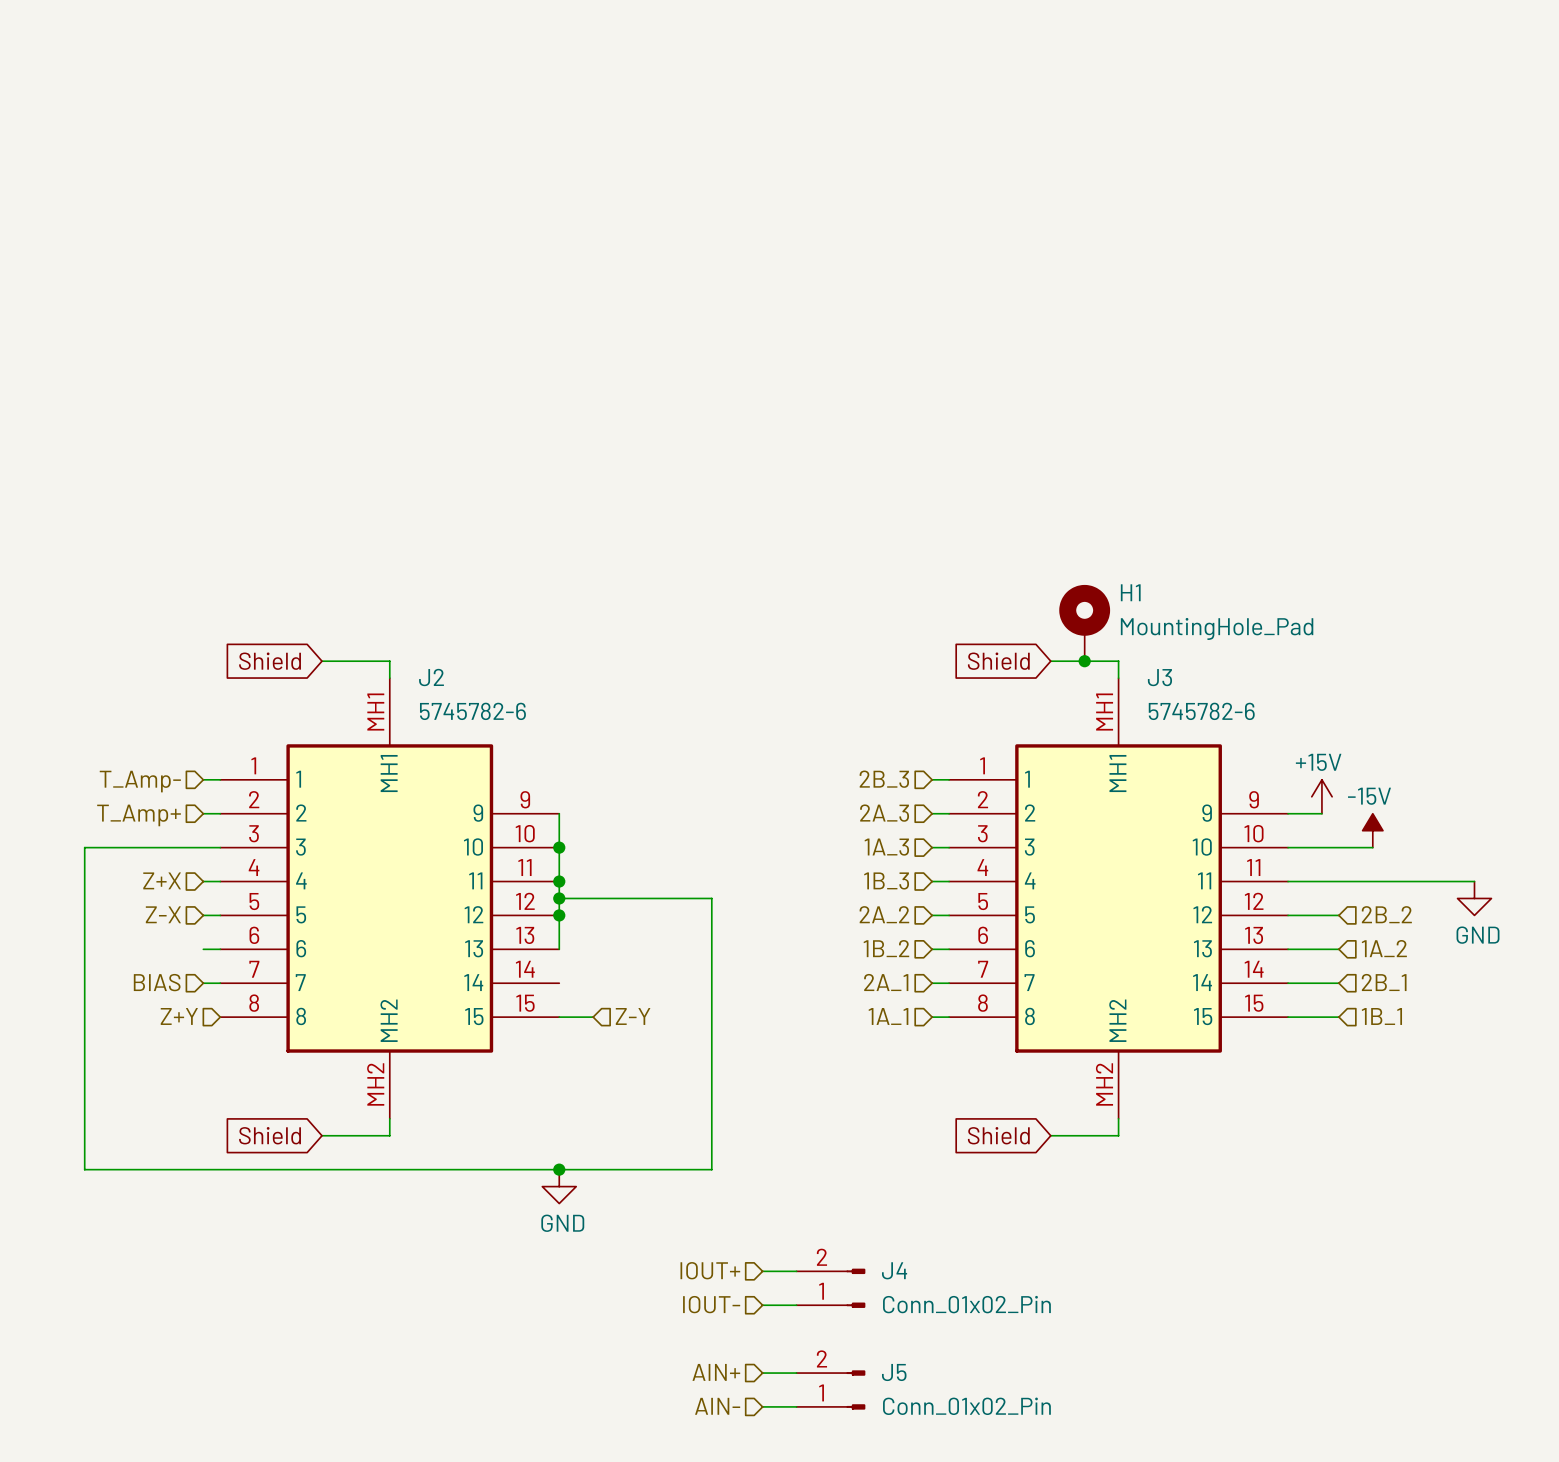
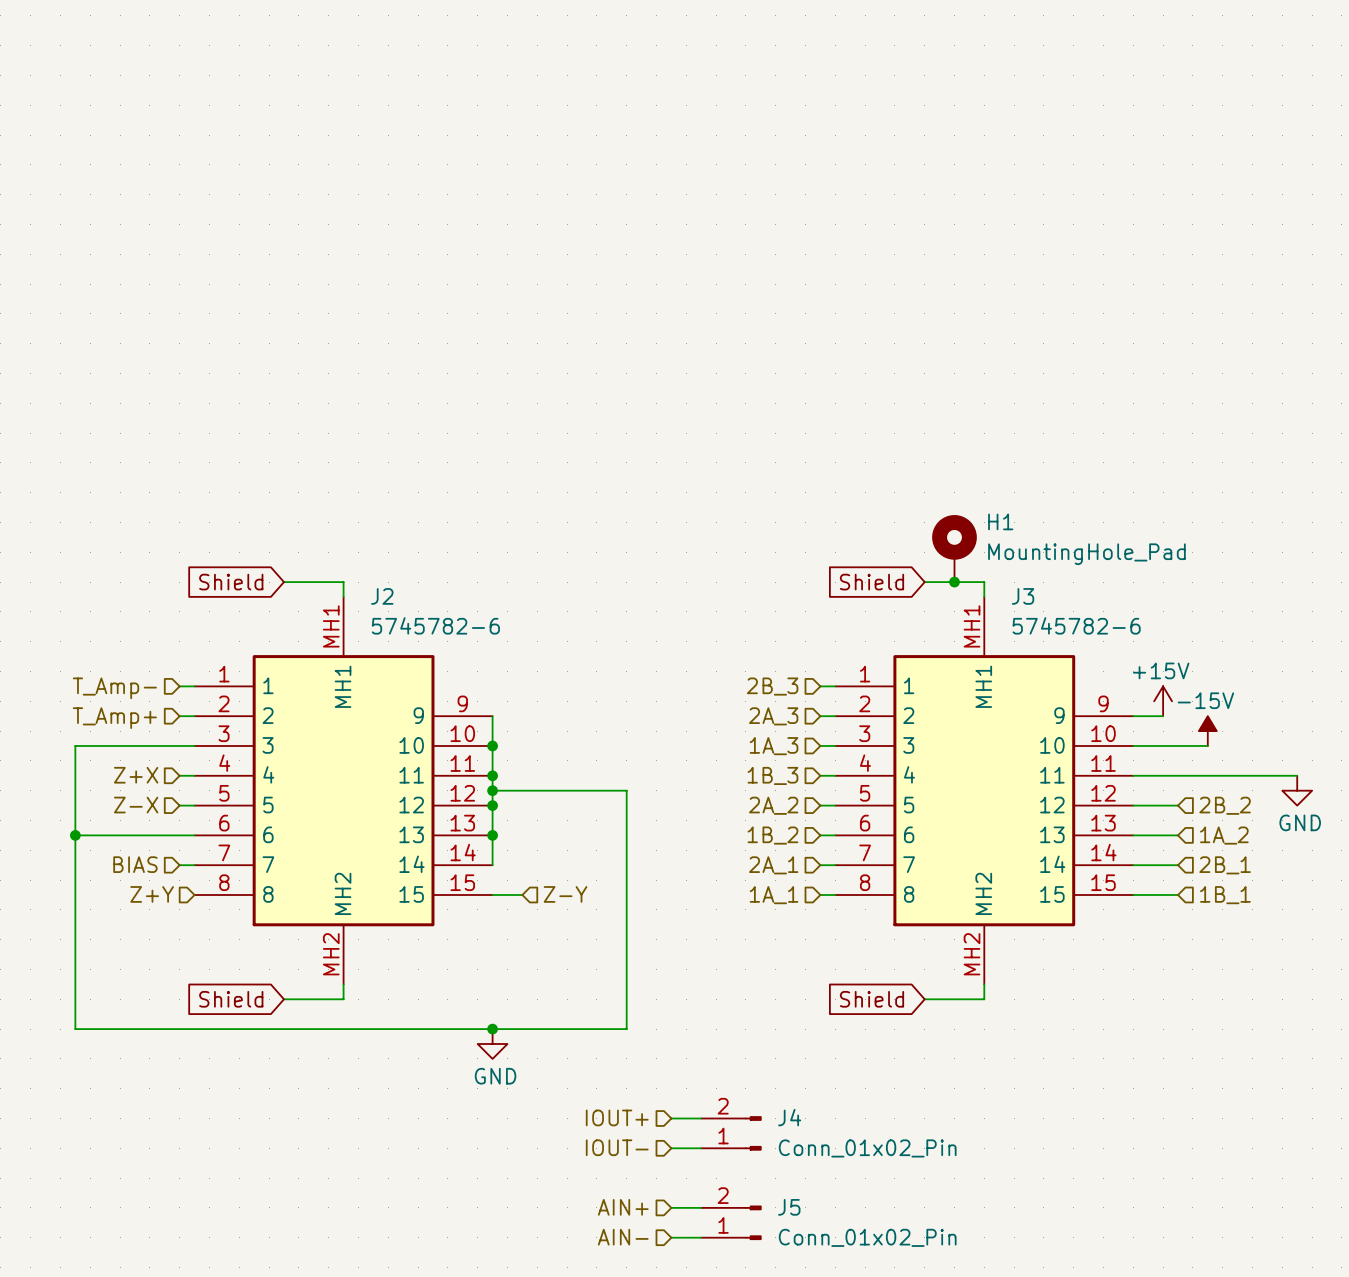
wire: none -> (75, 835) (179, 835)
junction: none -> (75, 835)
wire: none -> (492, 835) (492, 865)
junction: none -> (492, 835)

